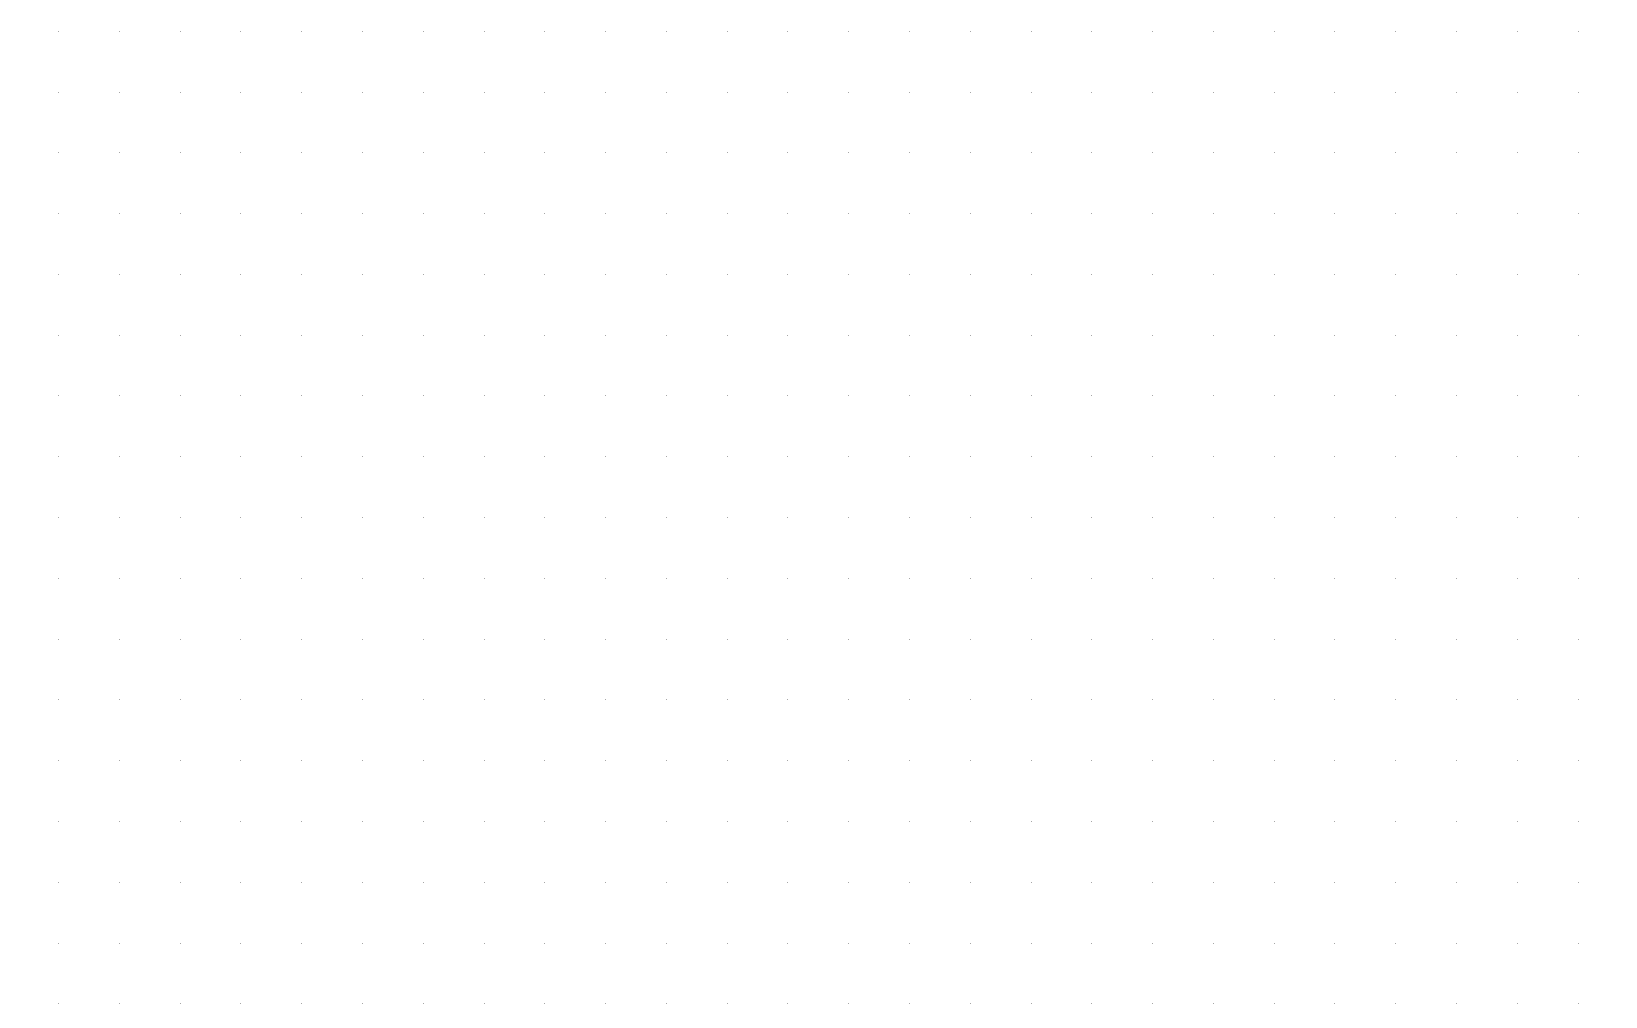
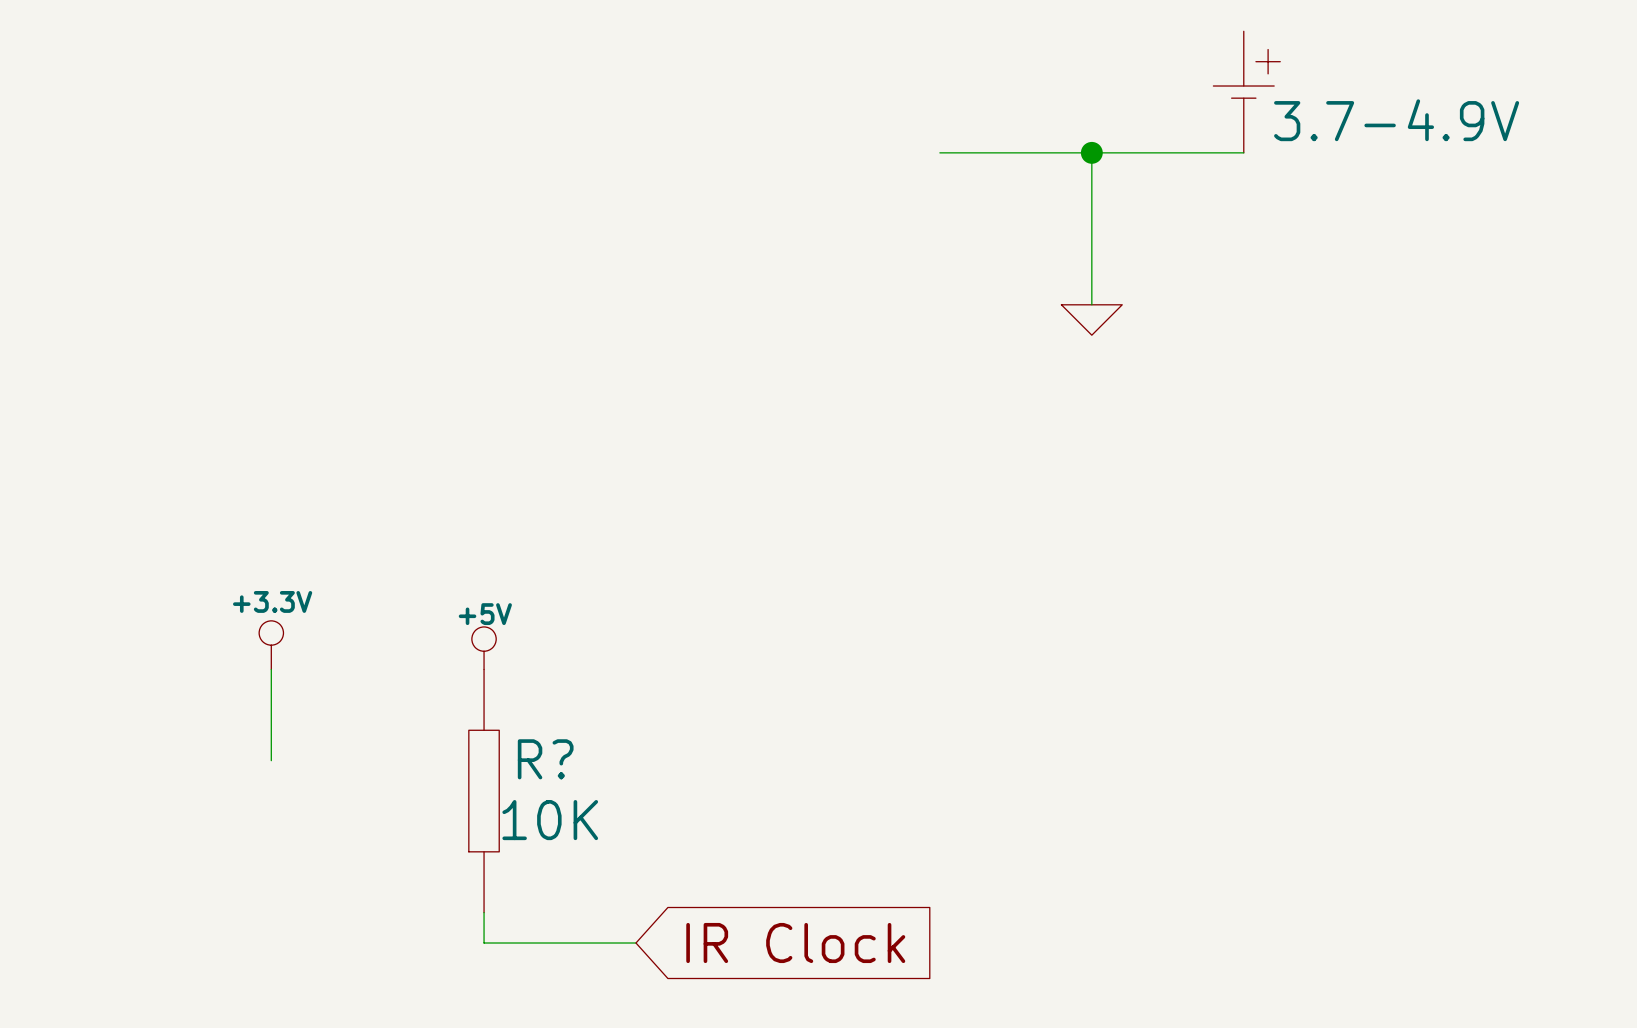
part: none -> (1246, 92)
wire: none -> (939, 152) (1243, 152)
wire: none -> (1091, 152) (1091, 304)
junction: none -> (1091, 152)
power symbol: none -> (1091, 320)
power symbol: none -> +3.3V (271, 645)
power symbol: none -> +5V (484, 648)
wire: none -> (271, 669) (271, 760)
R?: none -> (484, 791)
wire: none -> (484, 912) (484, 943) (635, 943)
global label: none -> IR Clock (795, 943)

